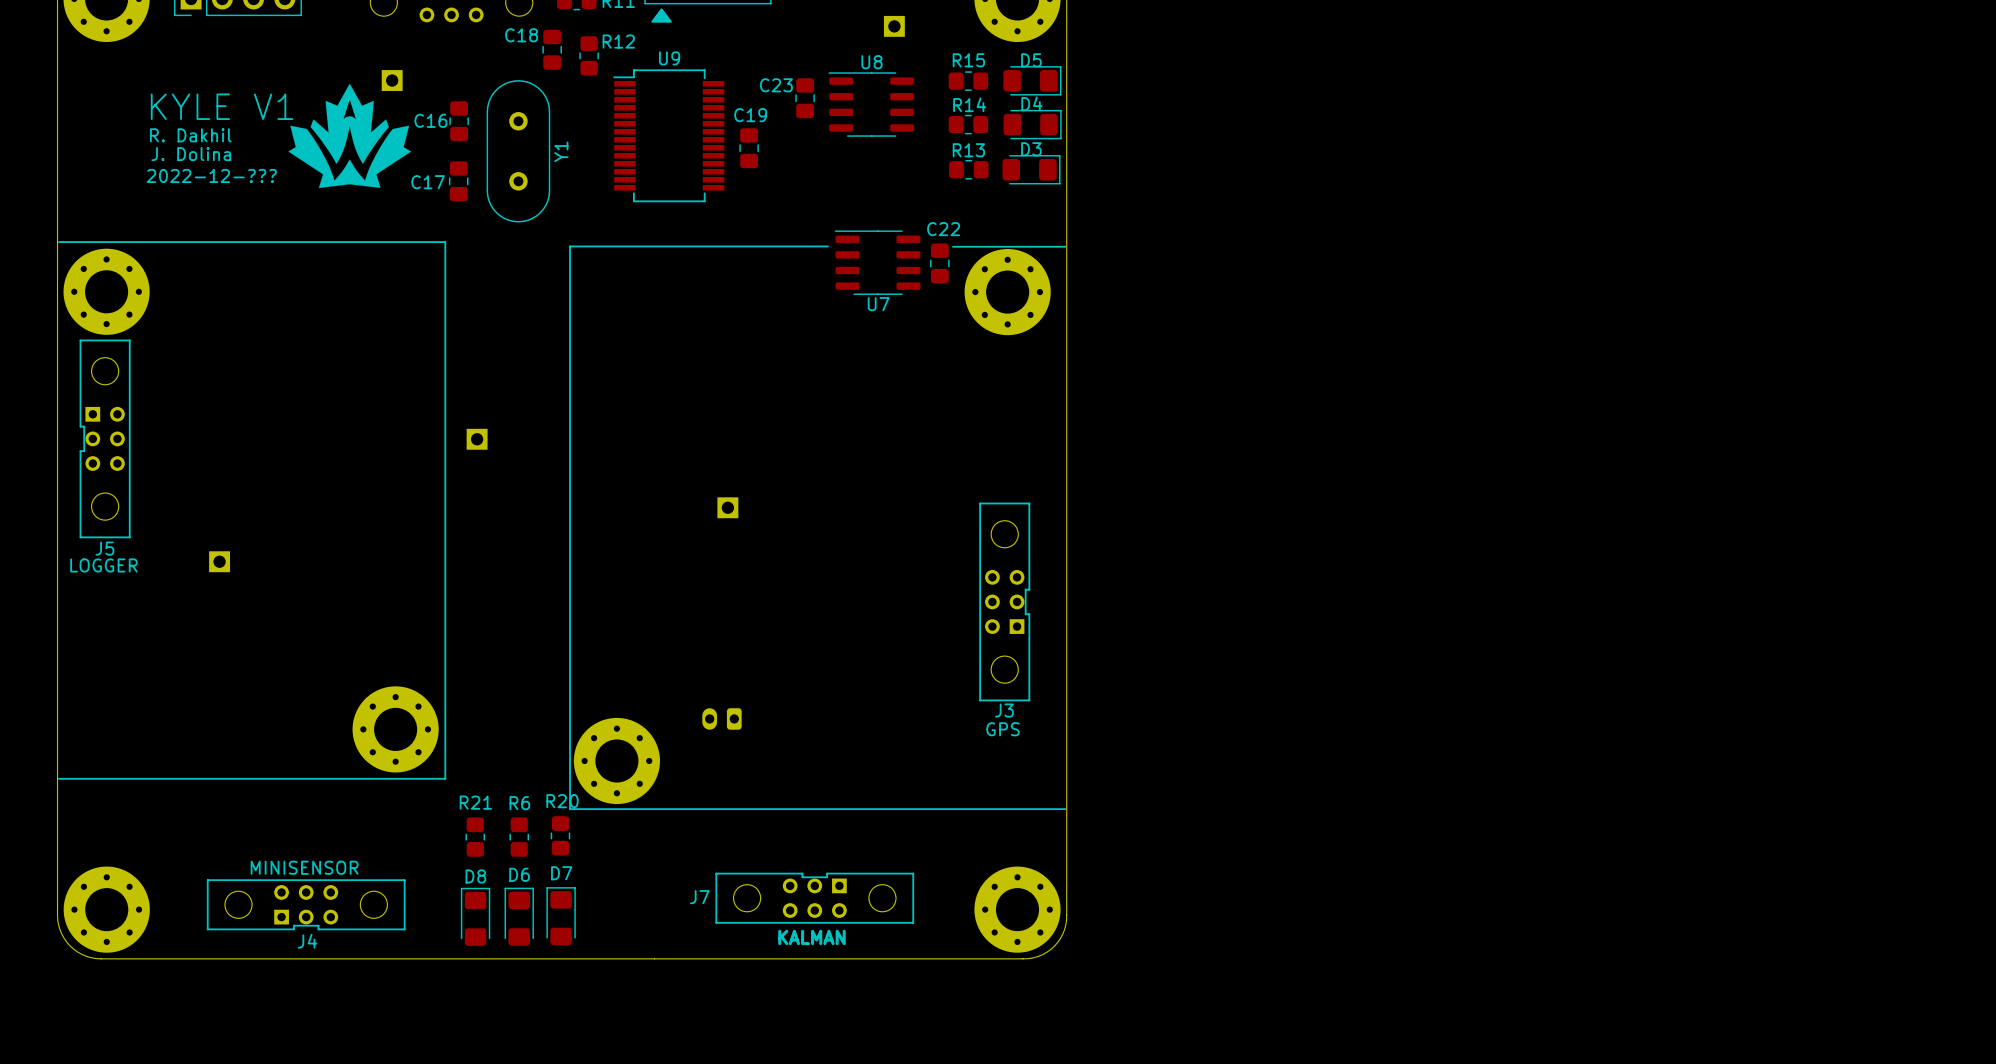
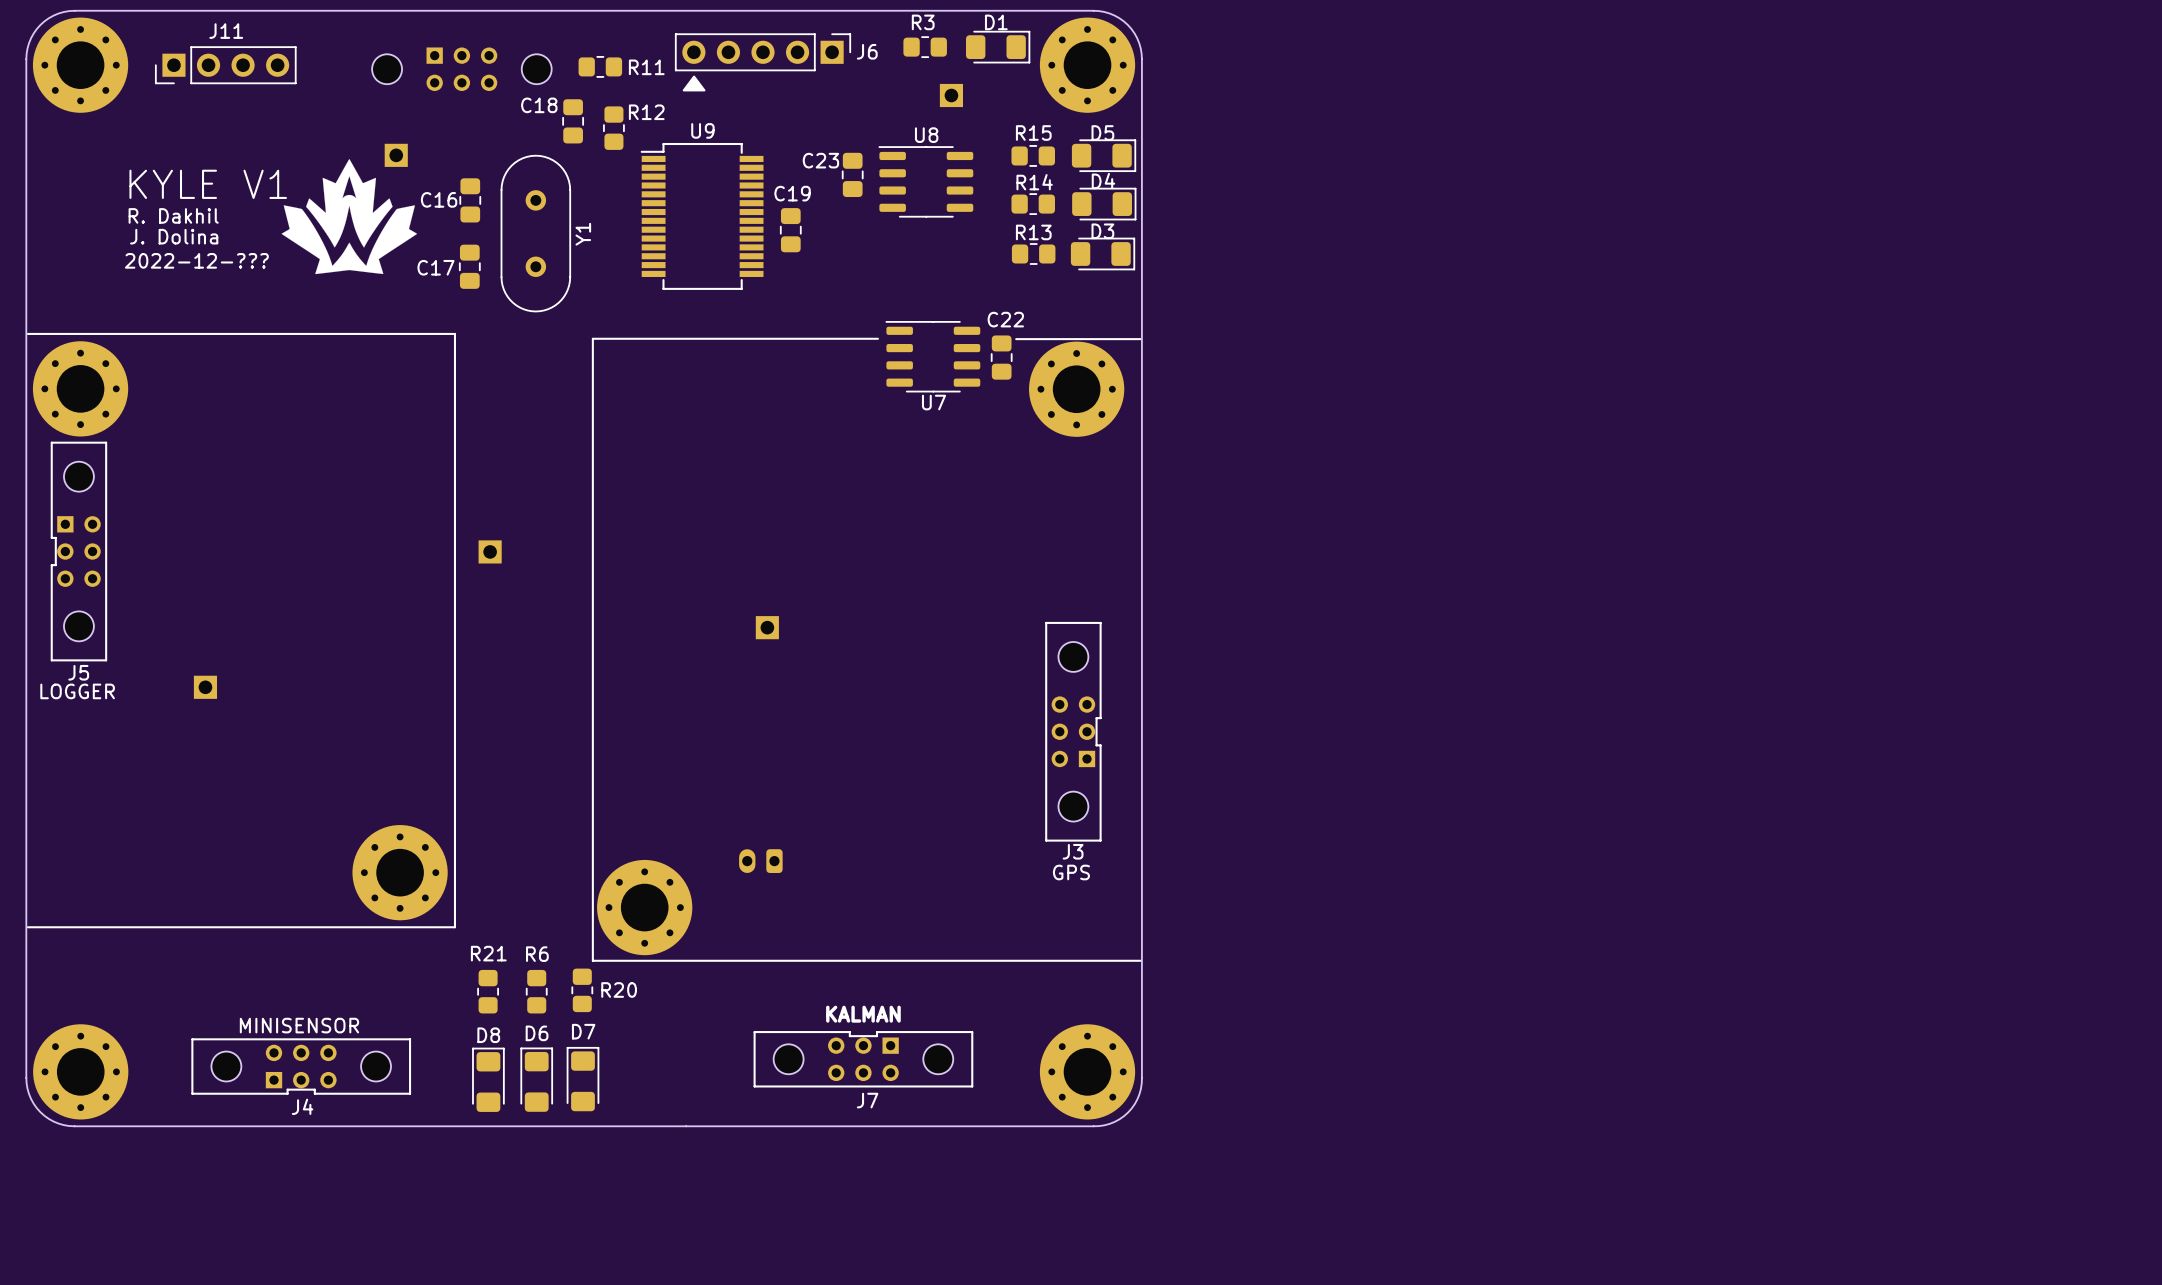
R20 name position: R20 (562, 801) -> R20 (619, 989)
J7 name position: J7 (699, 897) -> J7 (867, 1100)
text position: KALMAN (811, 937) -> KALMAN (863, 1014)

